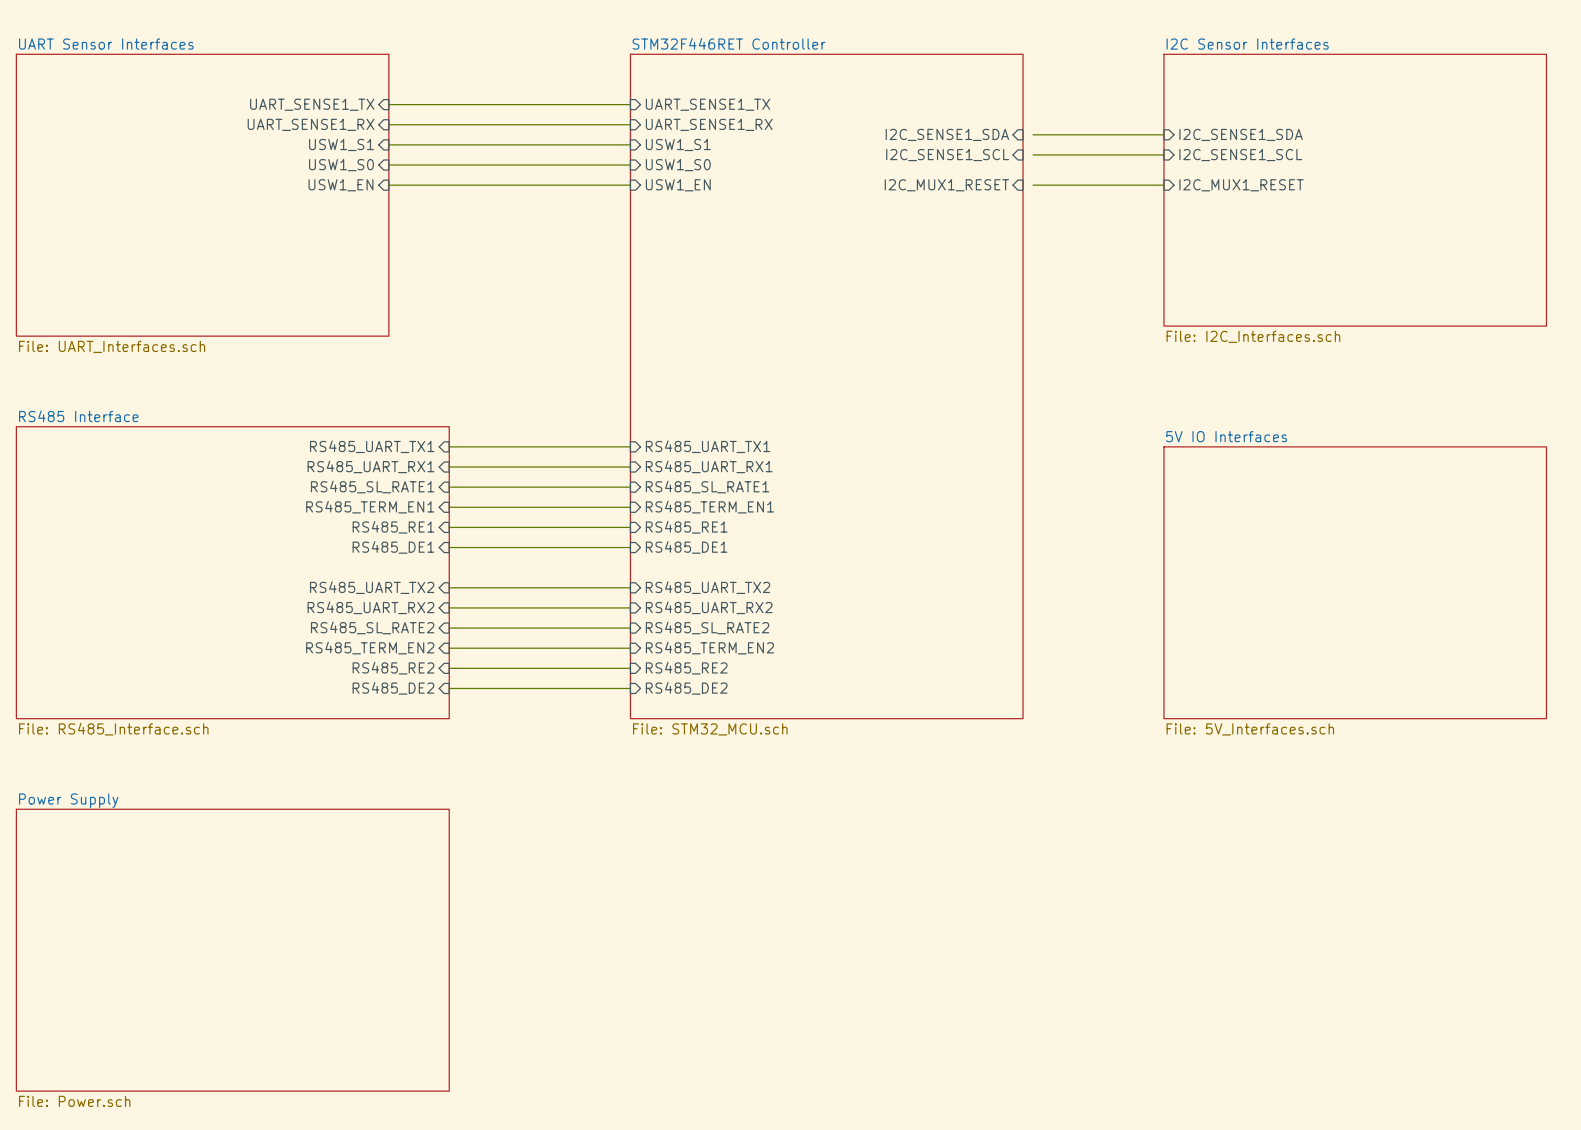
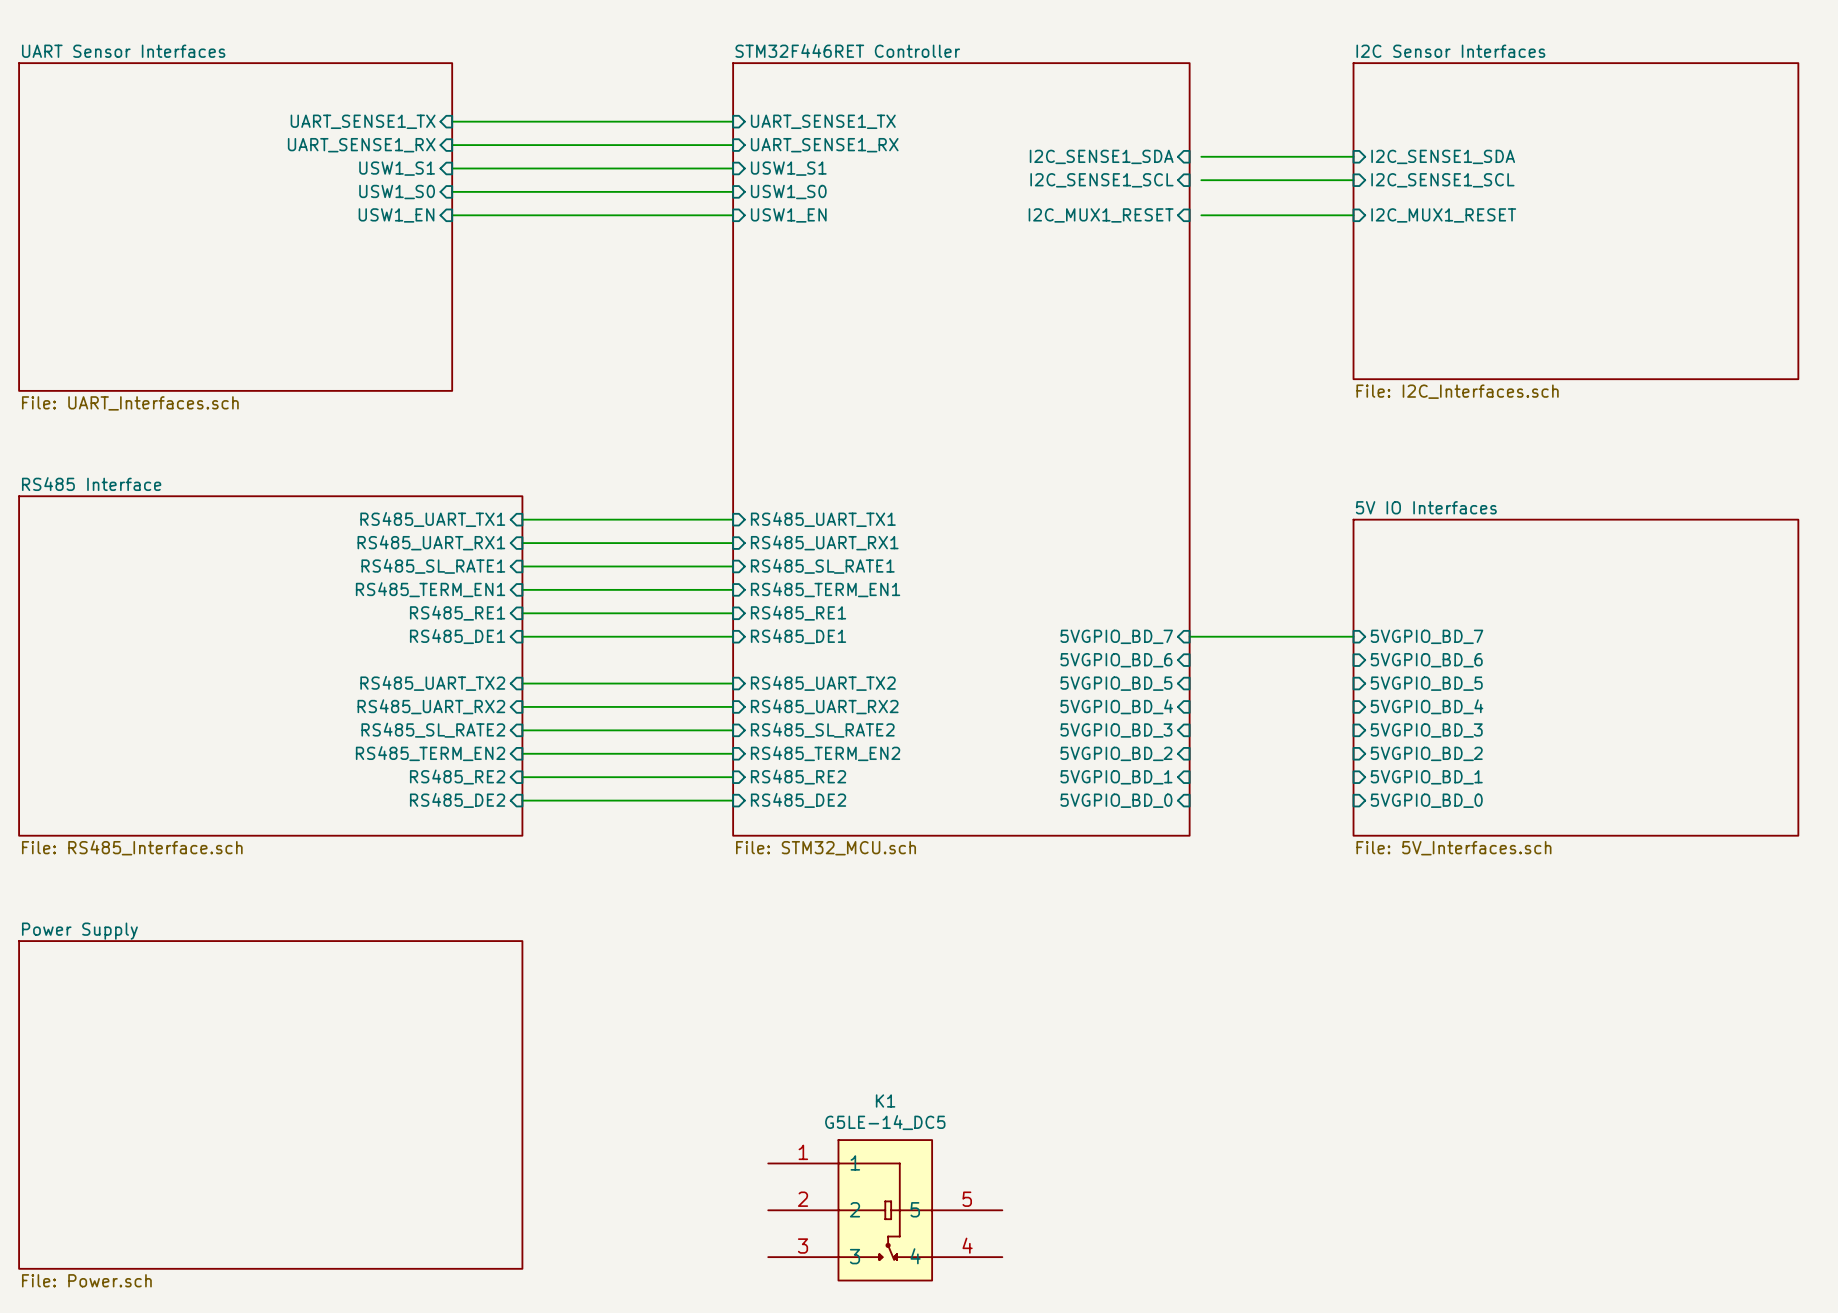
sheet pin: none -> 5VGPIO_BD_7 (1116, 636)
wire: none -> (1189, 636) (1353, 636)
sheet pin: none -> 5VGPIO_BD_7 (1427, 636)
sheet pin: none -> 5VGPIO_BD_6 (1116, 660)
sheet pin: none -> 5VGPIO_BD_6 (1426, 660)
sheet pin: none -> 5VGPIO_BD_5 (1116, 683)
sheet pin: none -> 5VGPIO_BD_5 (1426, 683)
sheet pin: none -> 5VGPIO_BD_4 (1116, 706)
sheet pin: none -> 5VGPIO_BD_4 (1427, 706)
sheet pin: none -> 5VGPIO_BD_3 (1116, 730)
sheet pin: none -> 5VGPIO_BD_3 (1426, 730)
sheet pin: none -> 5VGPIO_BD_2 (1116, 753)
sheet pin: none -> 5VGPIO_BD_2 (1426, 753)
sheet pin: none -> 5VGPIO_BD_1 (1116, 777)
sheet pin: none -> 5VGPIO_BD_1 (1426, 777)
sheet pin: none -> 5VGPIO_BD_0 (1116, 800)
sheet pin: none -> 5VGPIO_BD_0 (1426, 800)
K1: none -> G5LE-14_DC5 (885, 1210)

